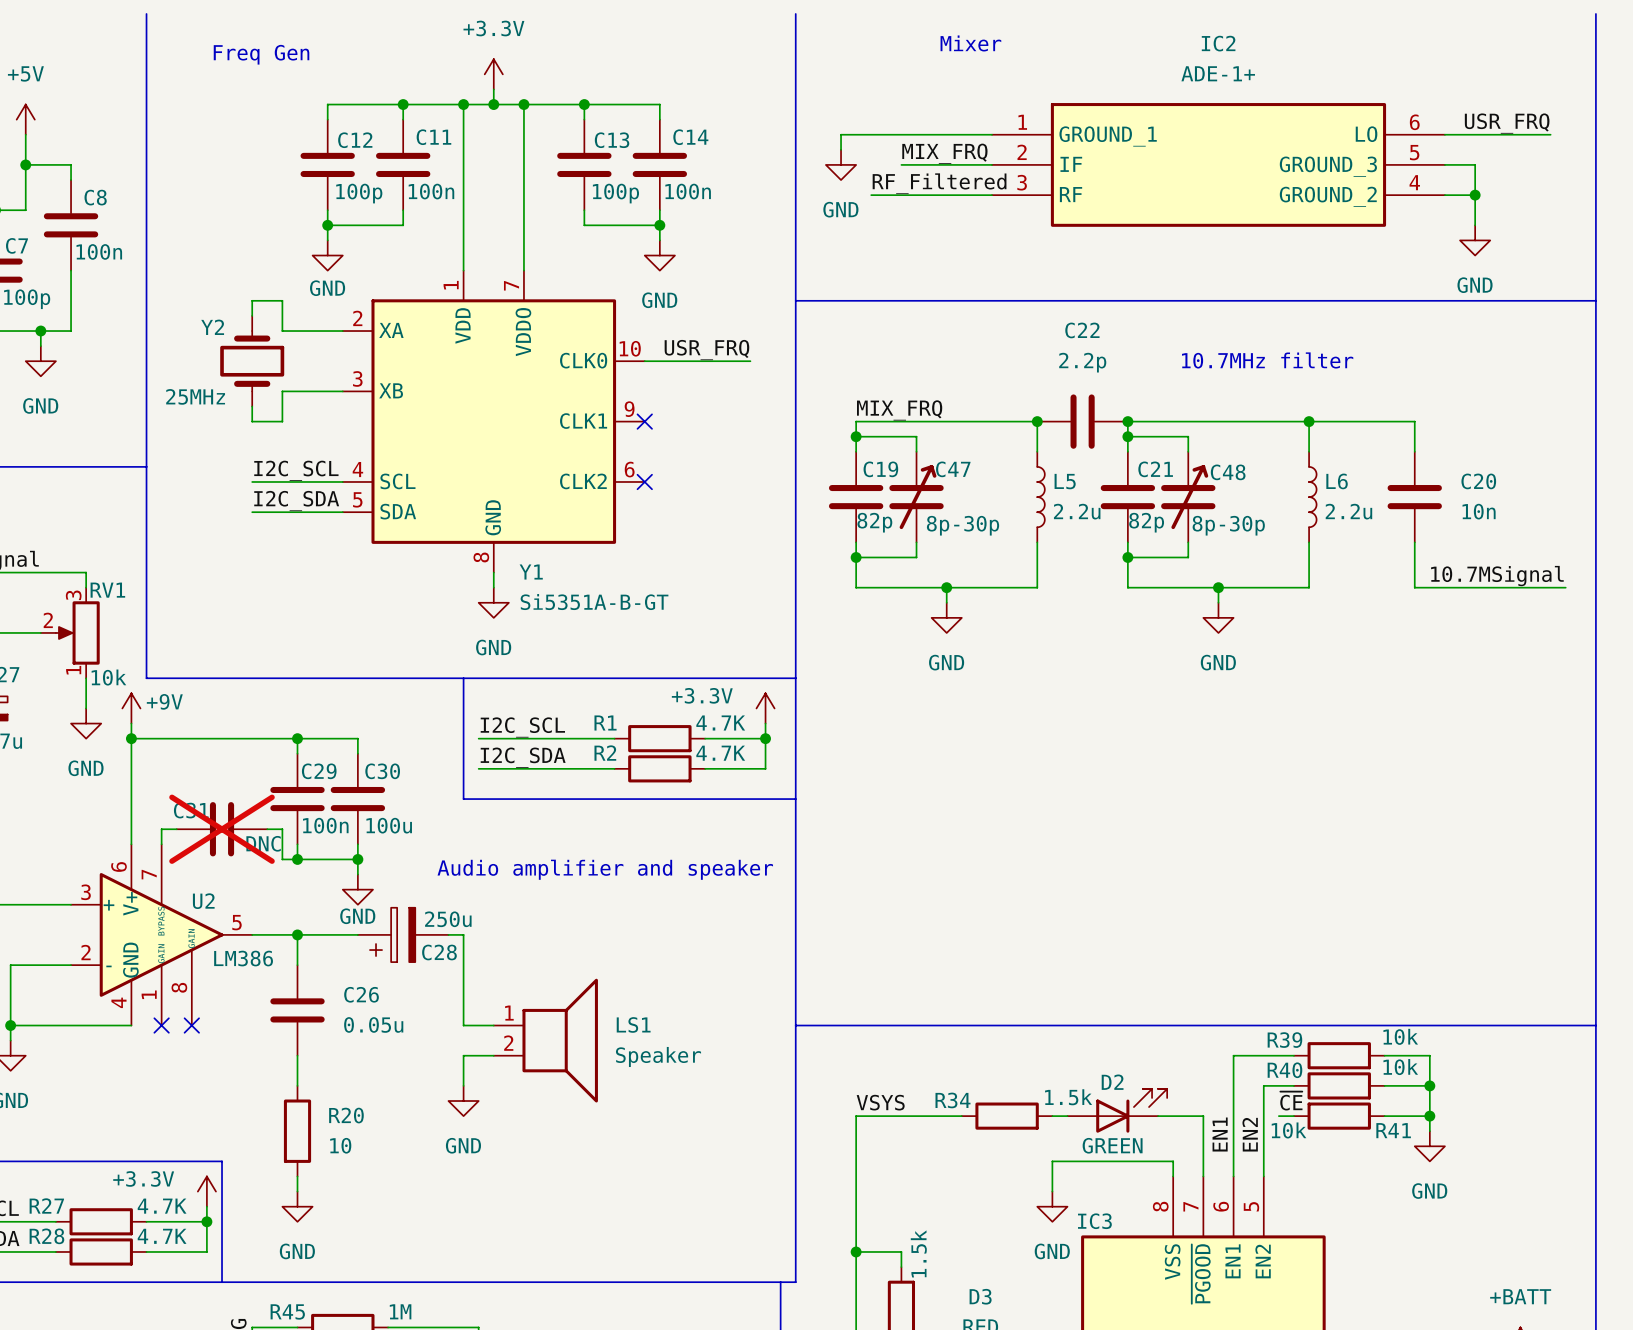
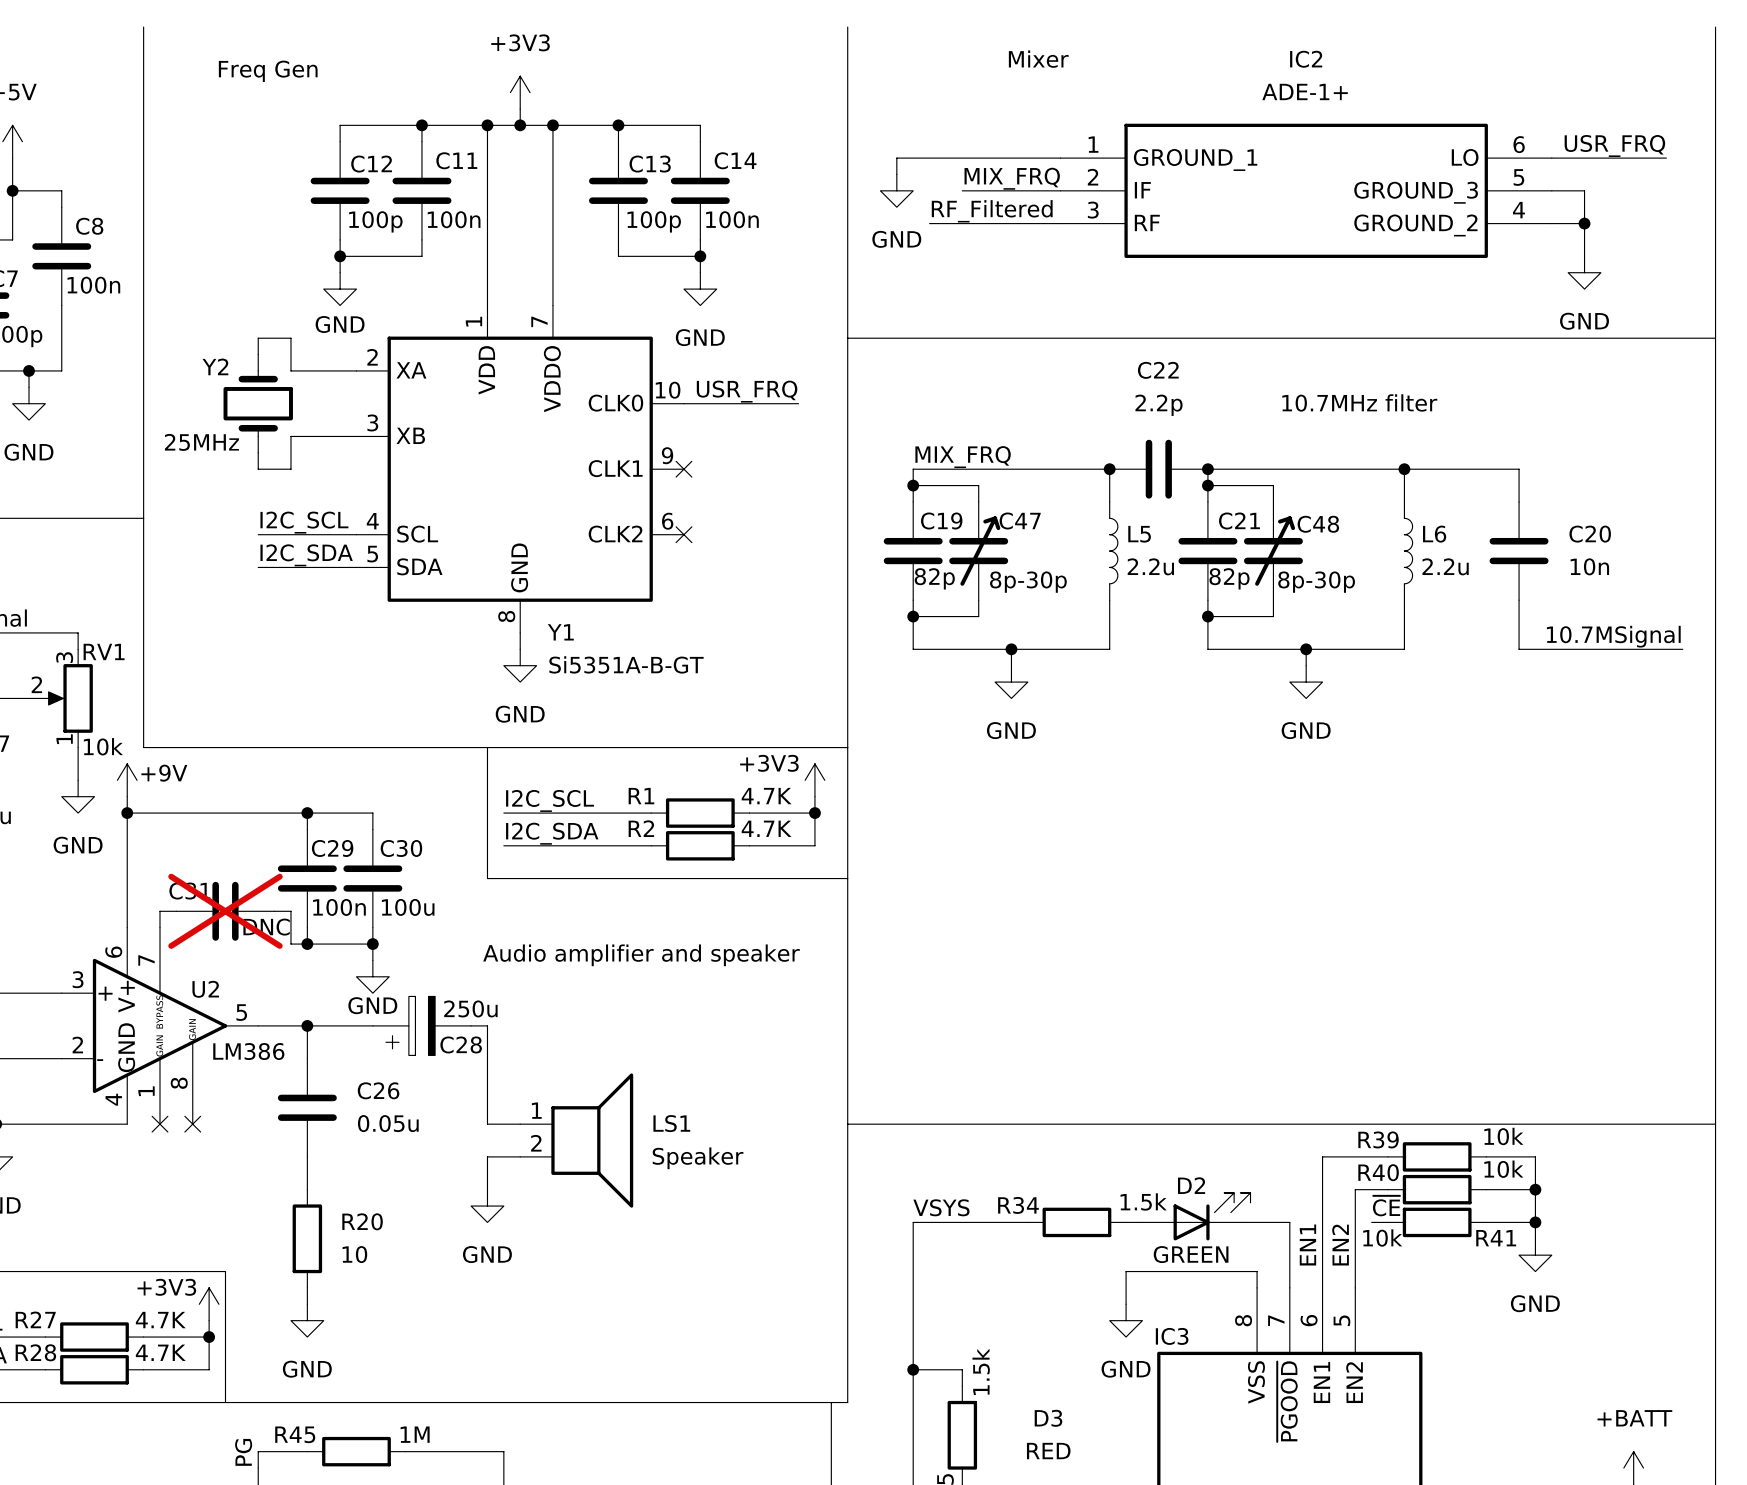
power symbol: +3.3V (493, 74) -> +3V3 (520, 92)
power symbol: +3.3V (765, 708) -> +3V3 (814, 780)
power symbol: +3.3V (206, 1191) -> +3V3 (209, 1304)

